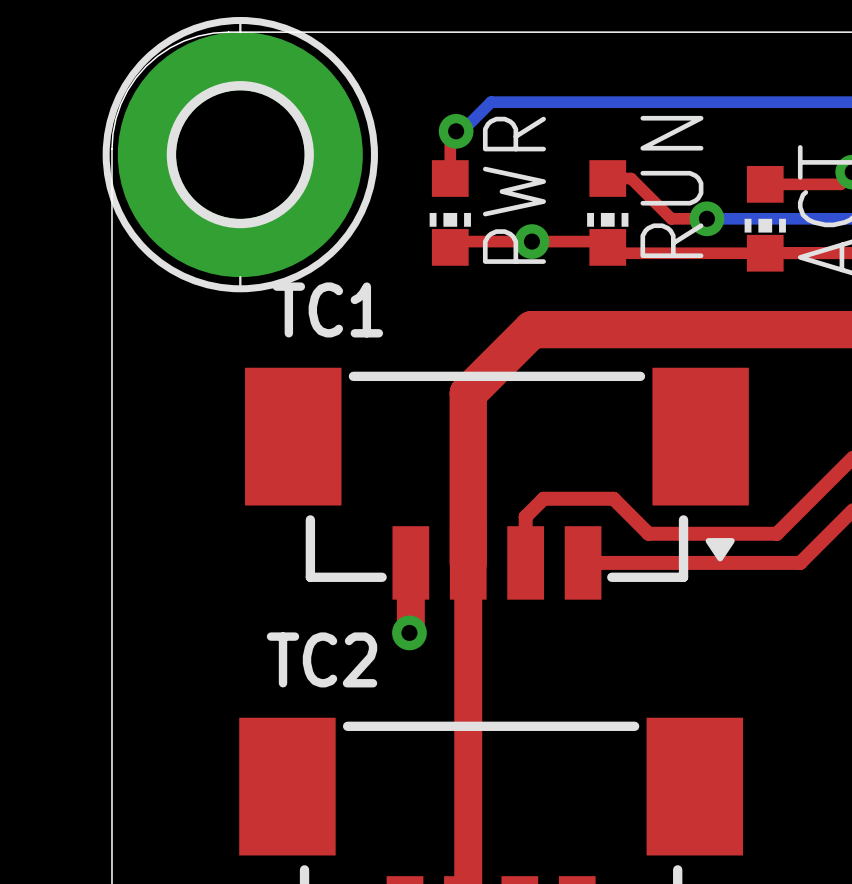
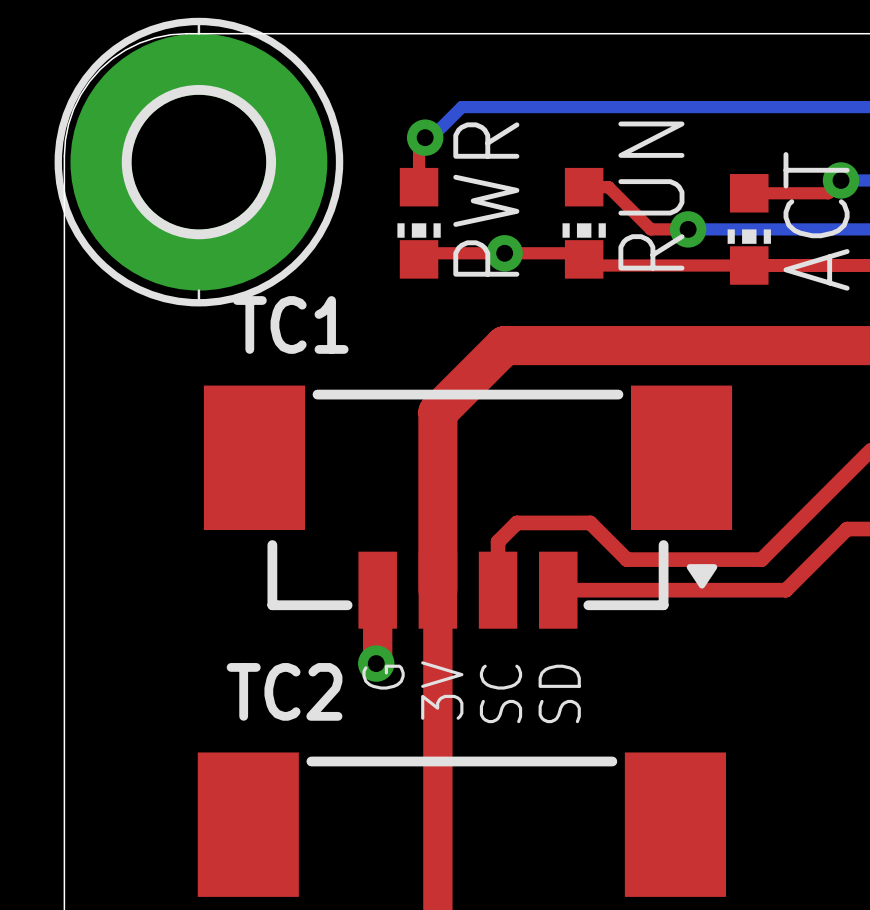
text: none -> G (383, 677)
text: none -> 3V (442, 690)
text: none -> SC (501, 693)
text: none -> SD (559, 693)

